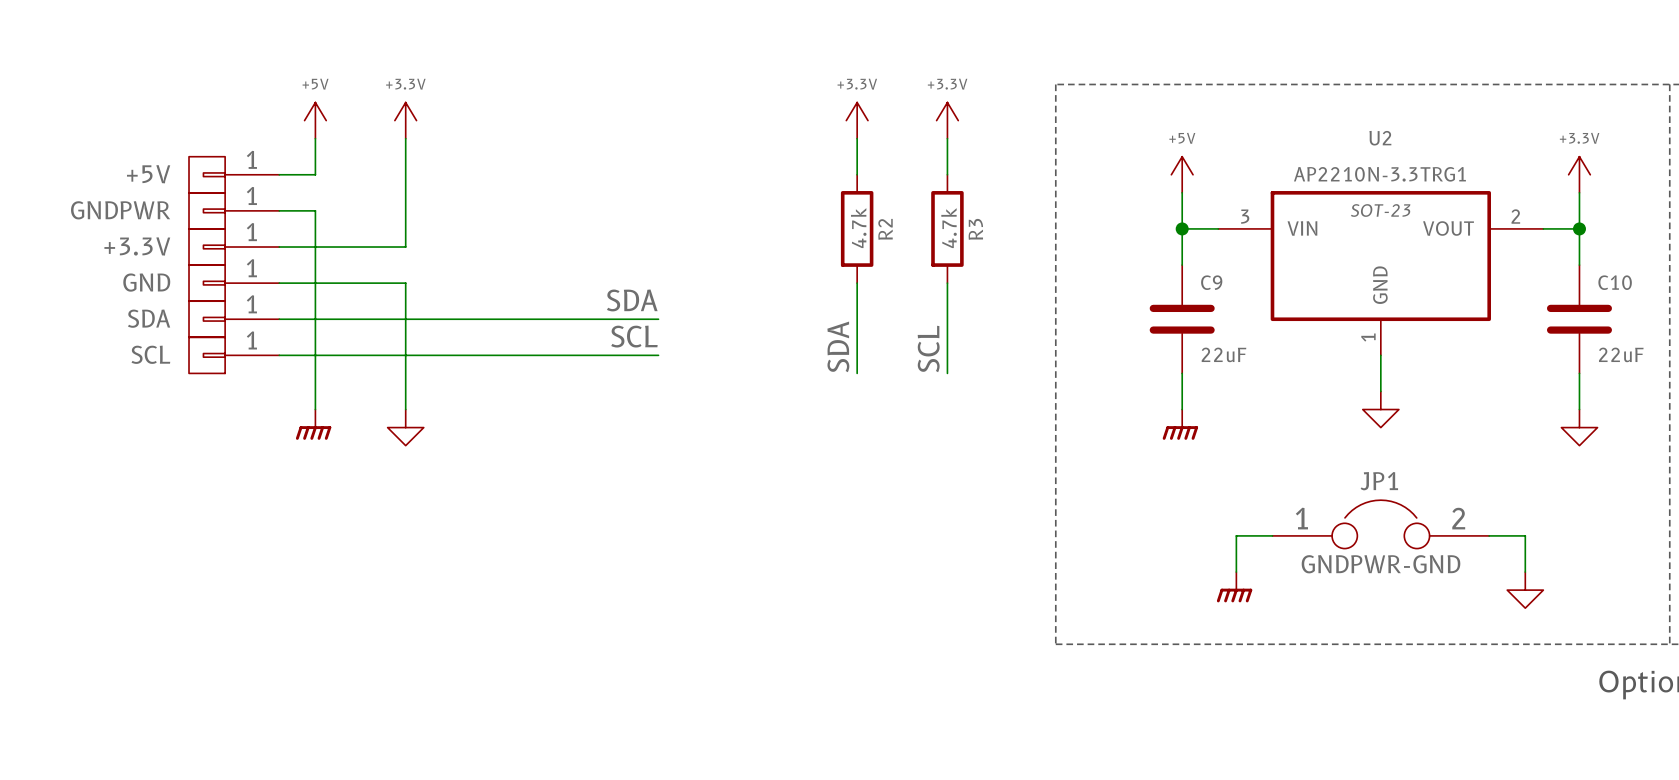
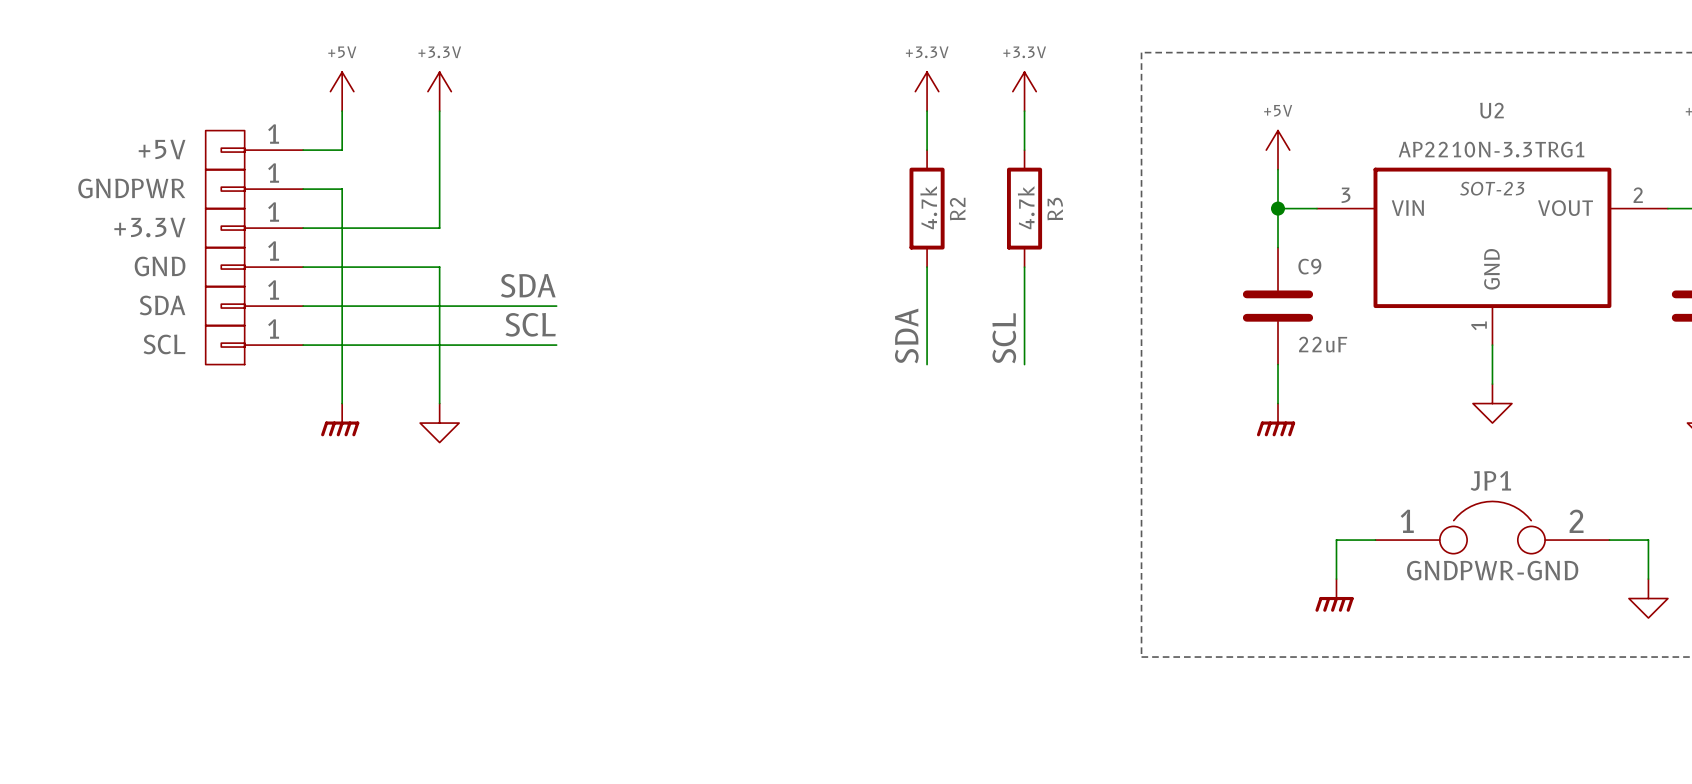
label position: SDA (632, 300) -> SDA (528, 285)
wire: (514, 319) (658, 319) -> none
label position: SCL (634, 336) -> SCL (530, 324)
wire: (514, 355) (658, 355) -> none

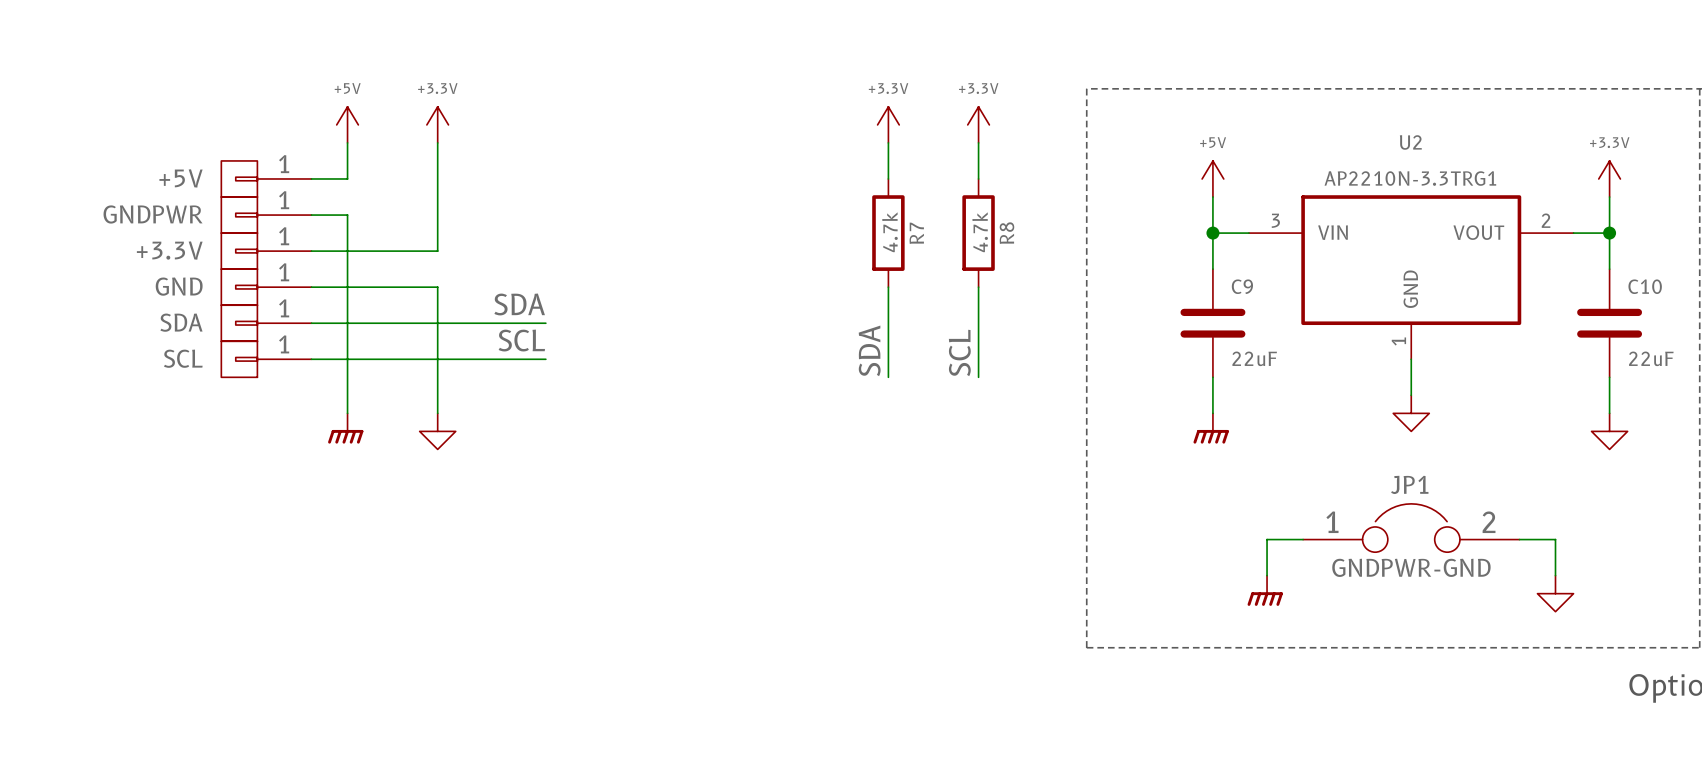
U2 text: SOT-23 (1492, 188) -> none
R2 name: R2 (957, 209) -> R7 (916, 233)
R3 name: R3 (1055, 209) -> R8 (1006, 233)

